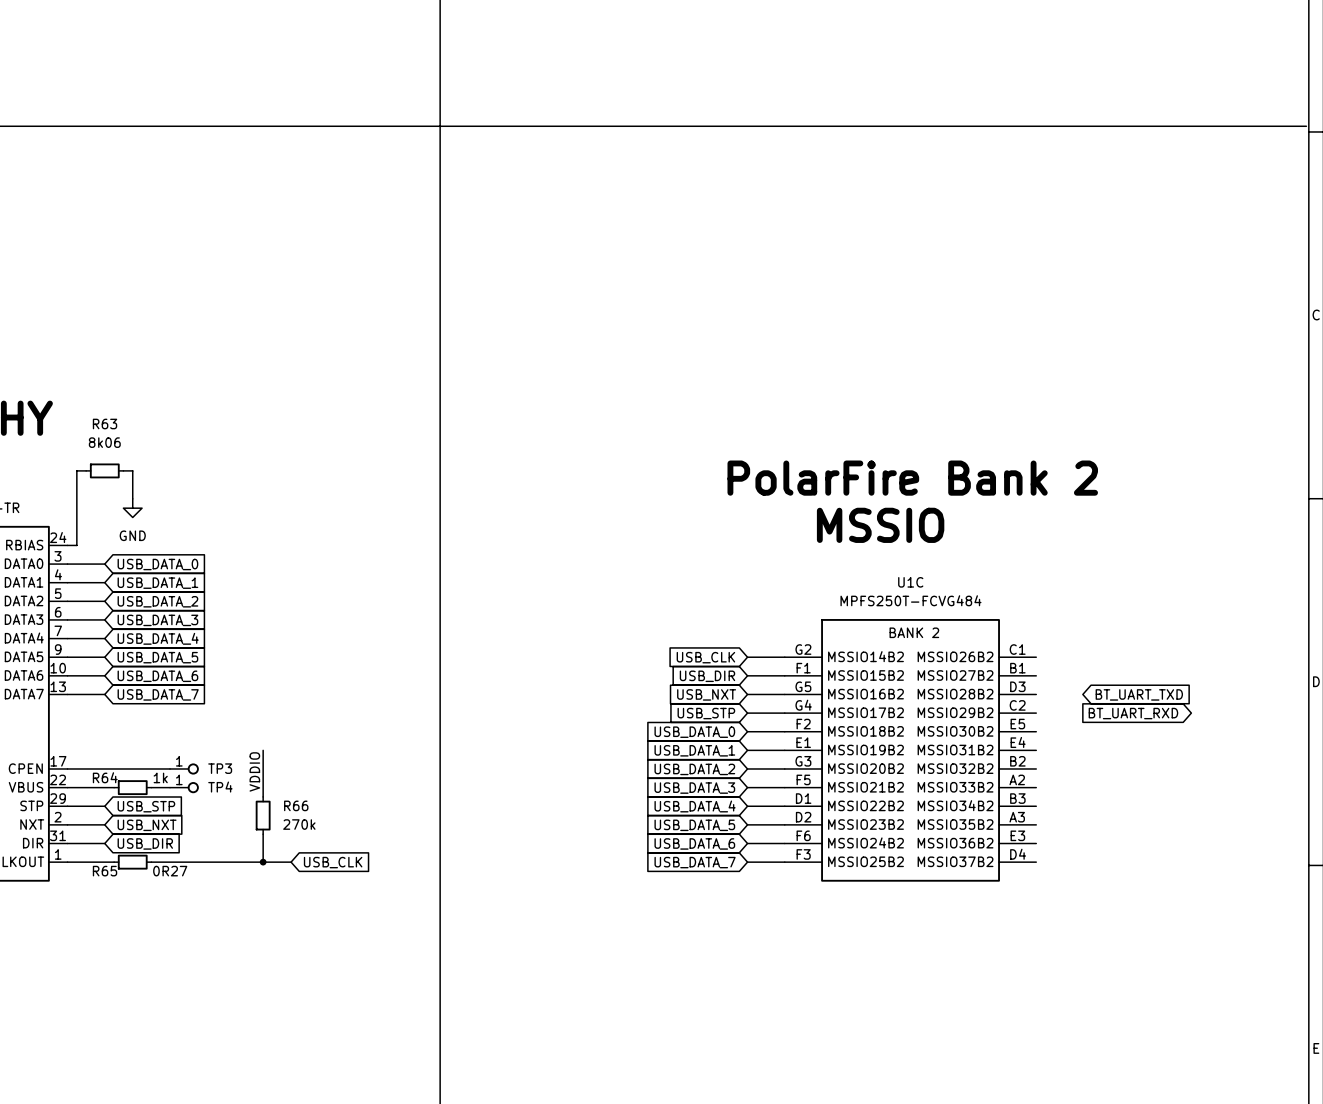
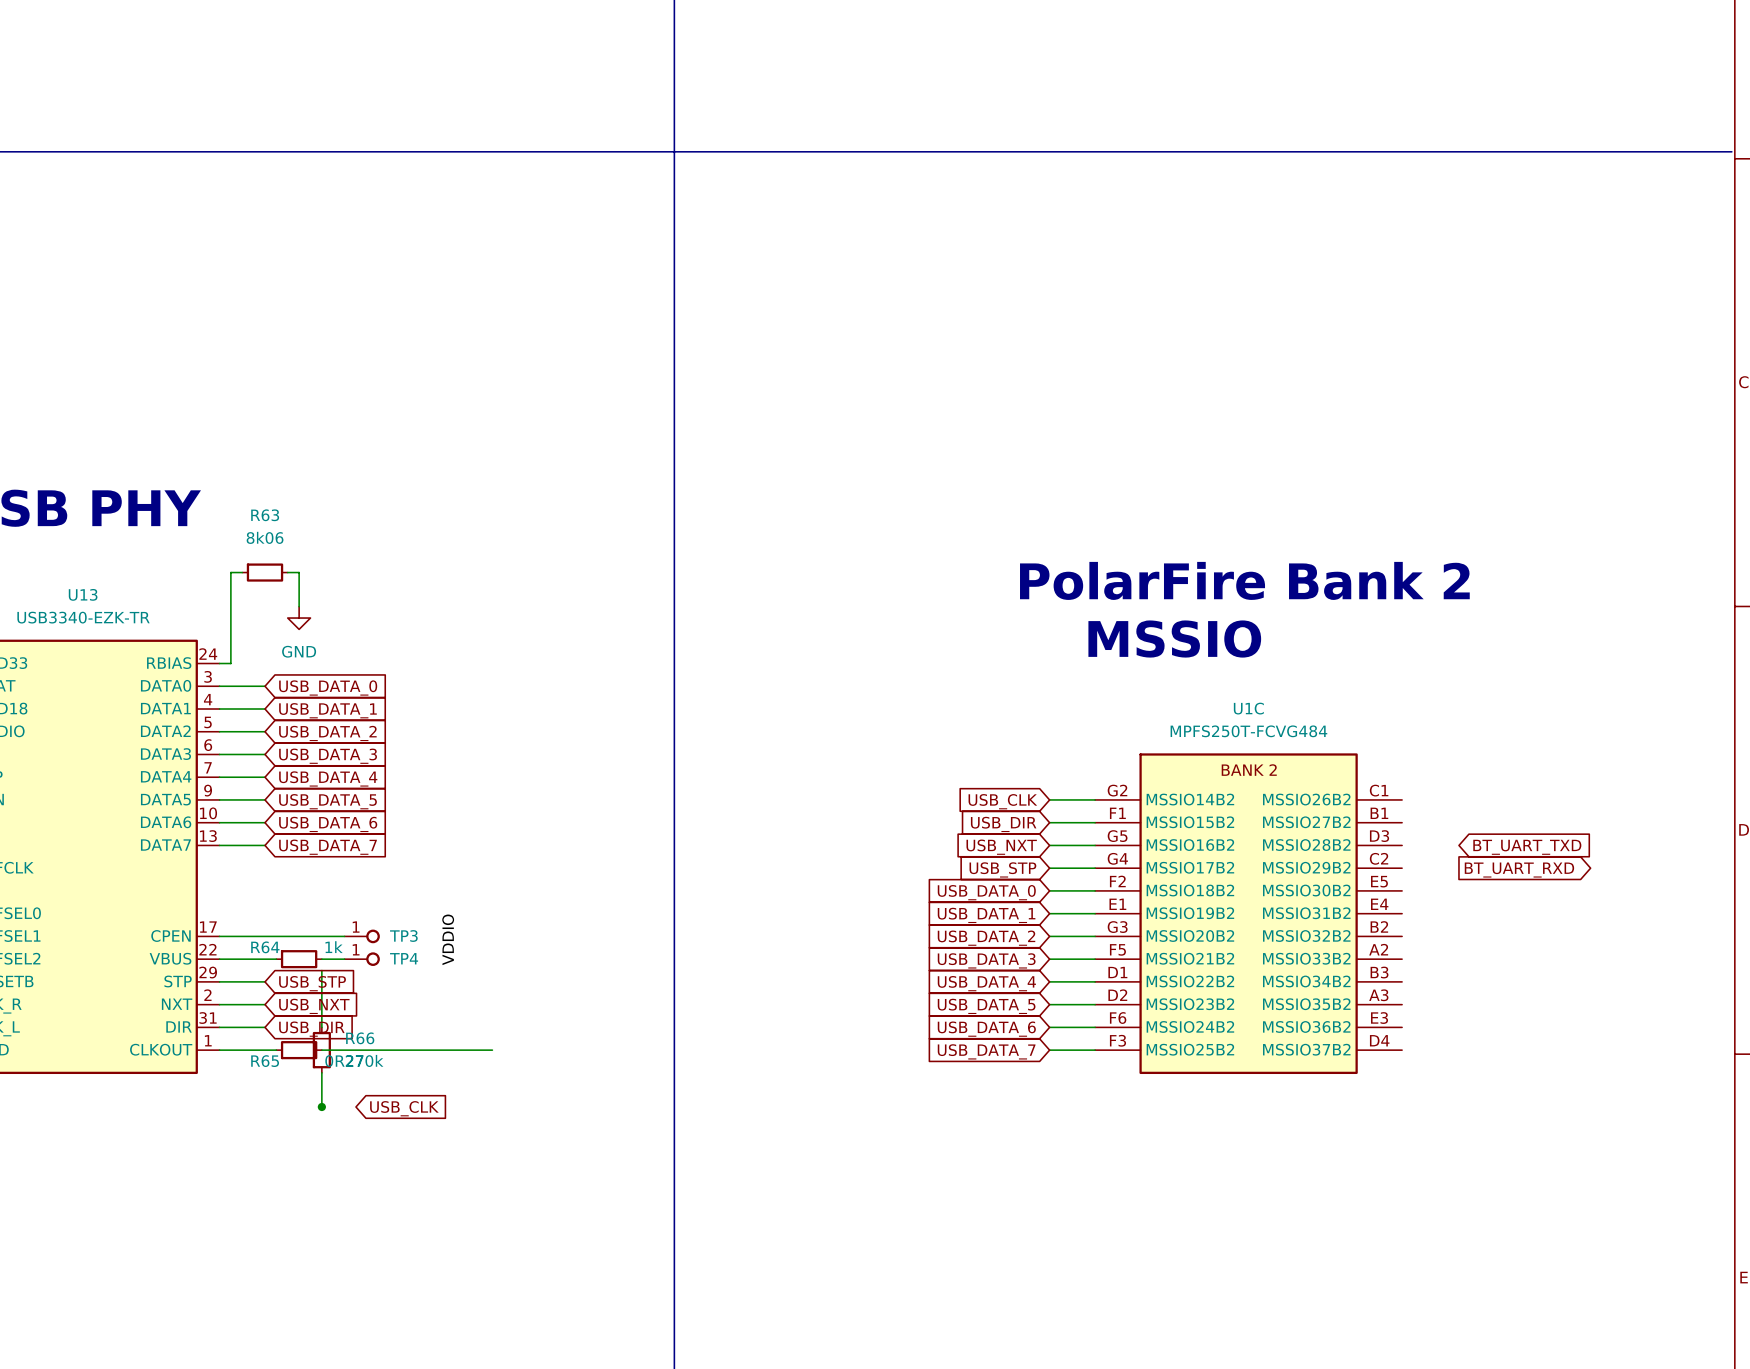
wire: (263, 750) (263, 796) -> (321, 970) (321, 1027)
R66 position: (263, 815) -> (321, 1050)
wire: (263, 834) (263, 862) -> (321, 1072) (321, 1106)
junction: (263, 862) -> none
global label position: USB_CLK (333, 862) -> USB_CLK (404, 1108)
junction: none -> (321, 1106)

